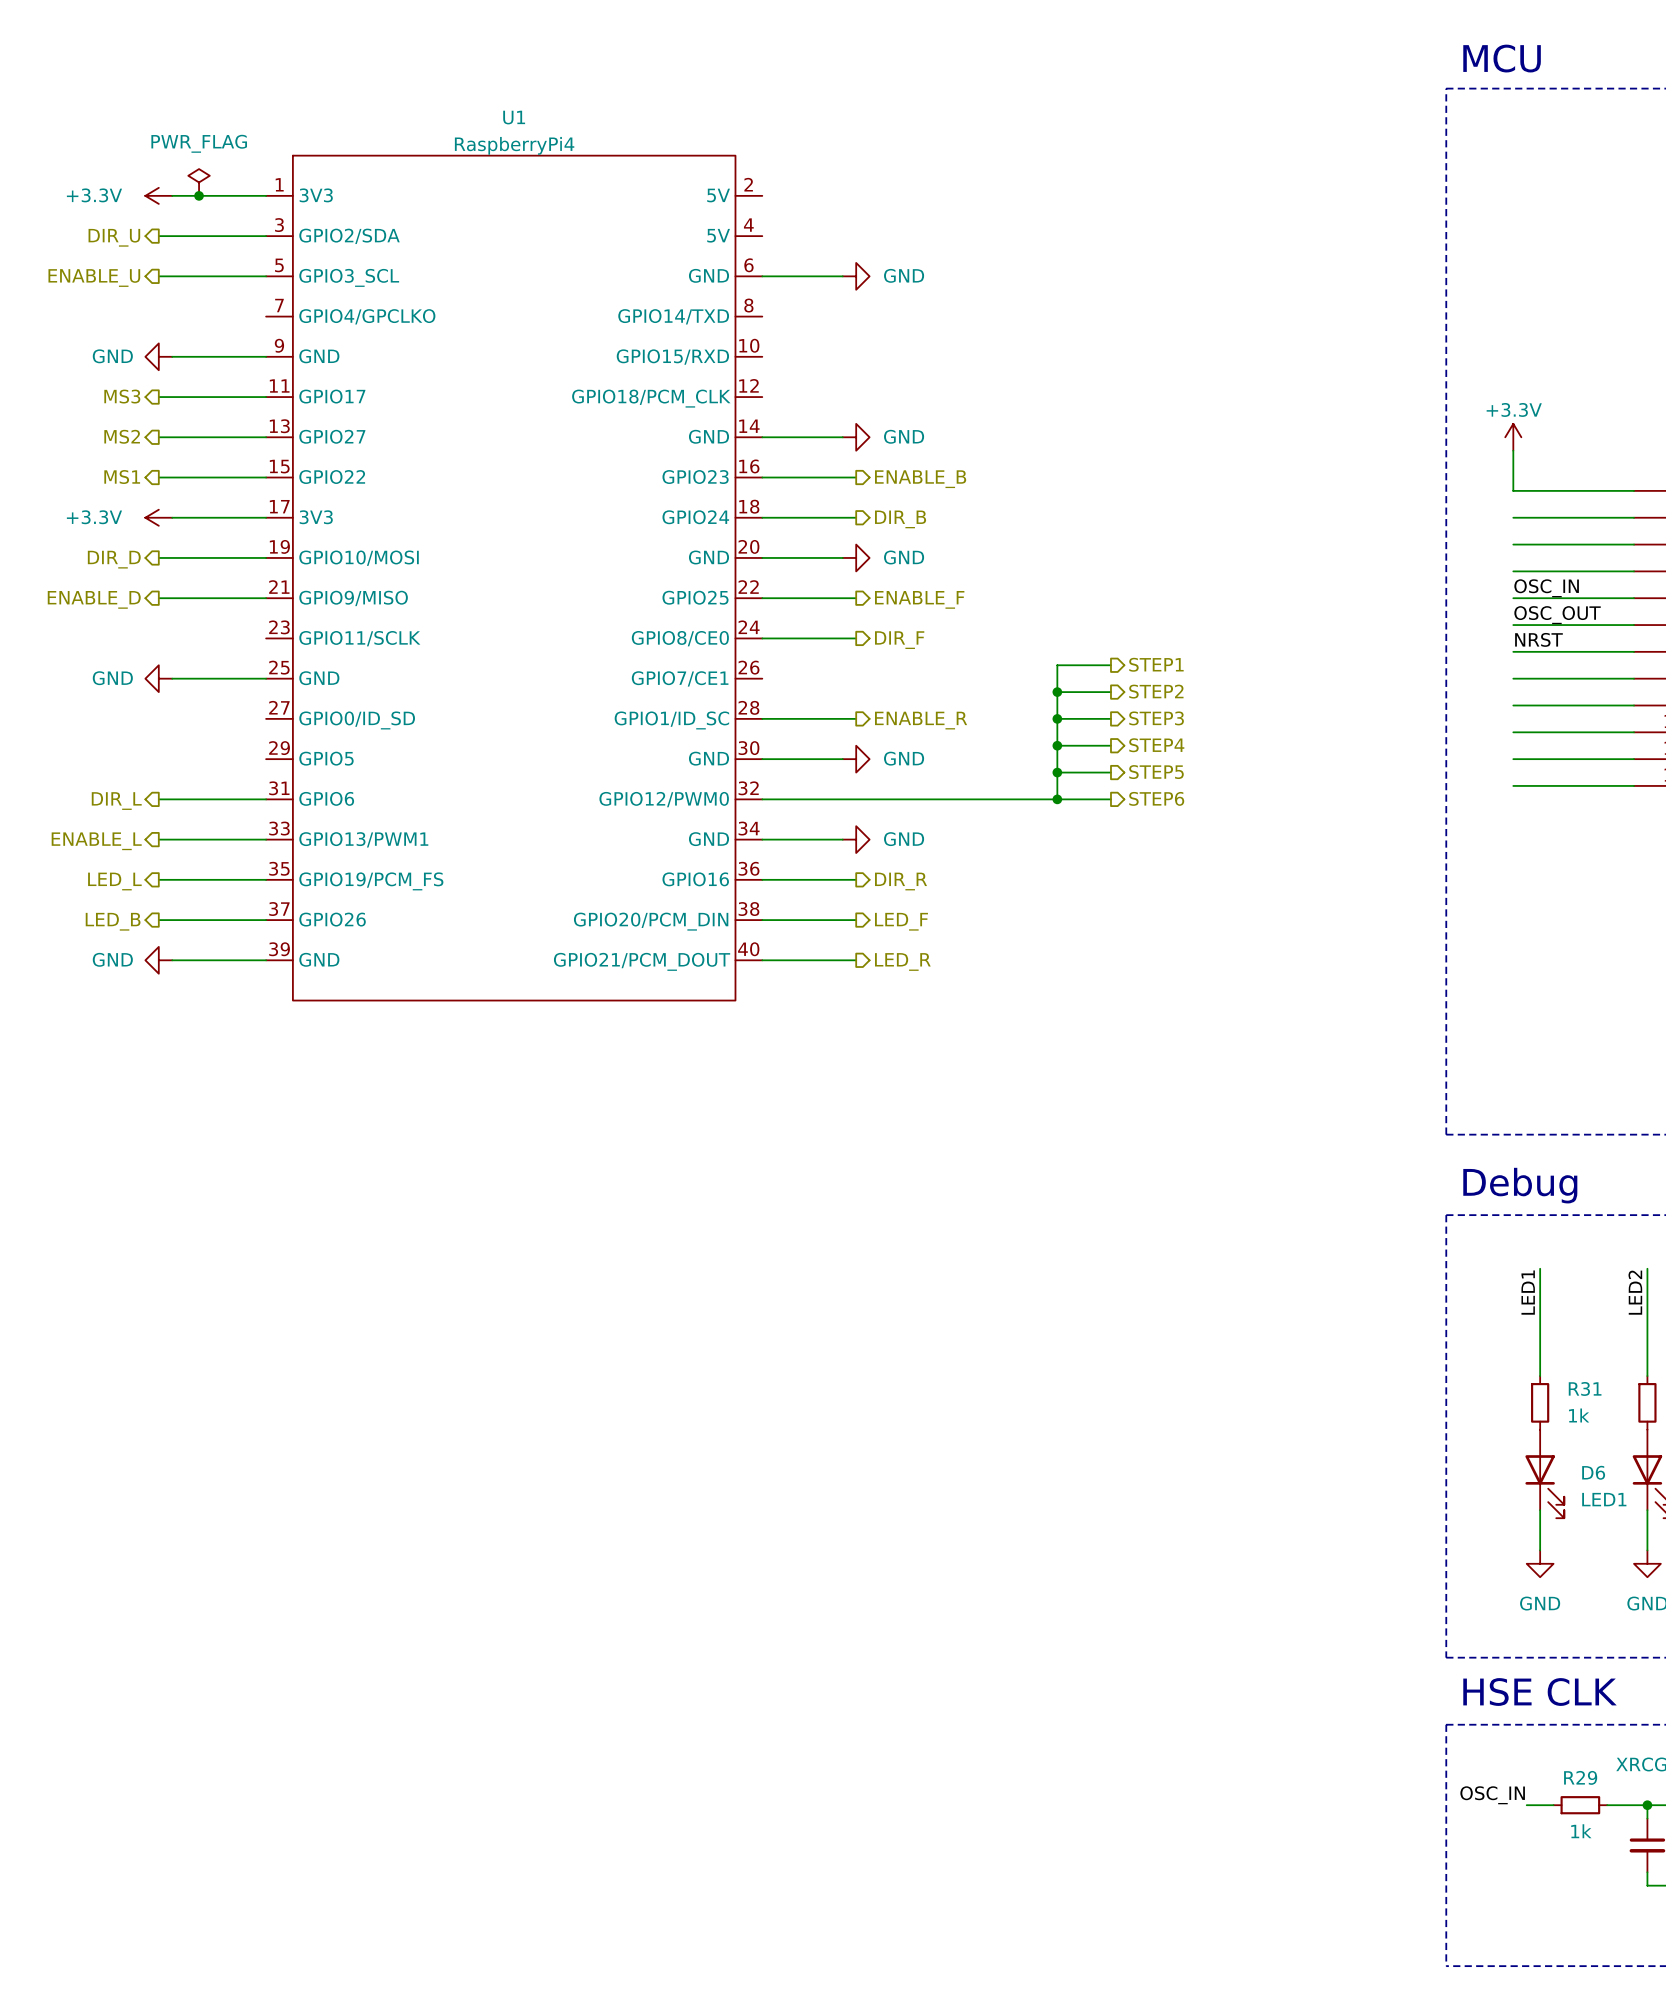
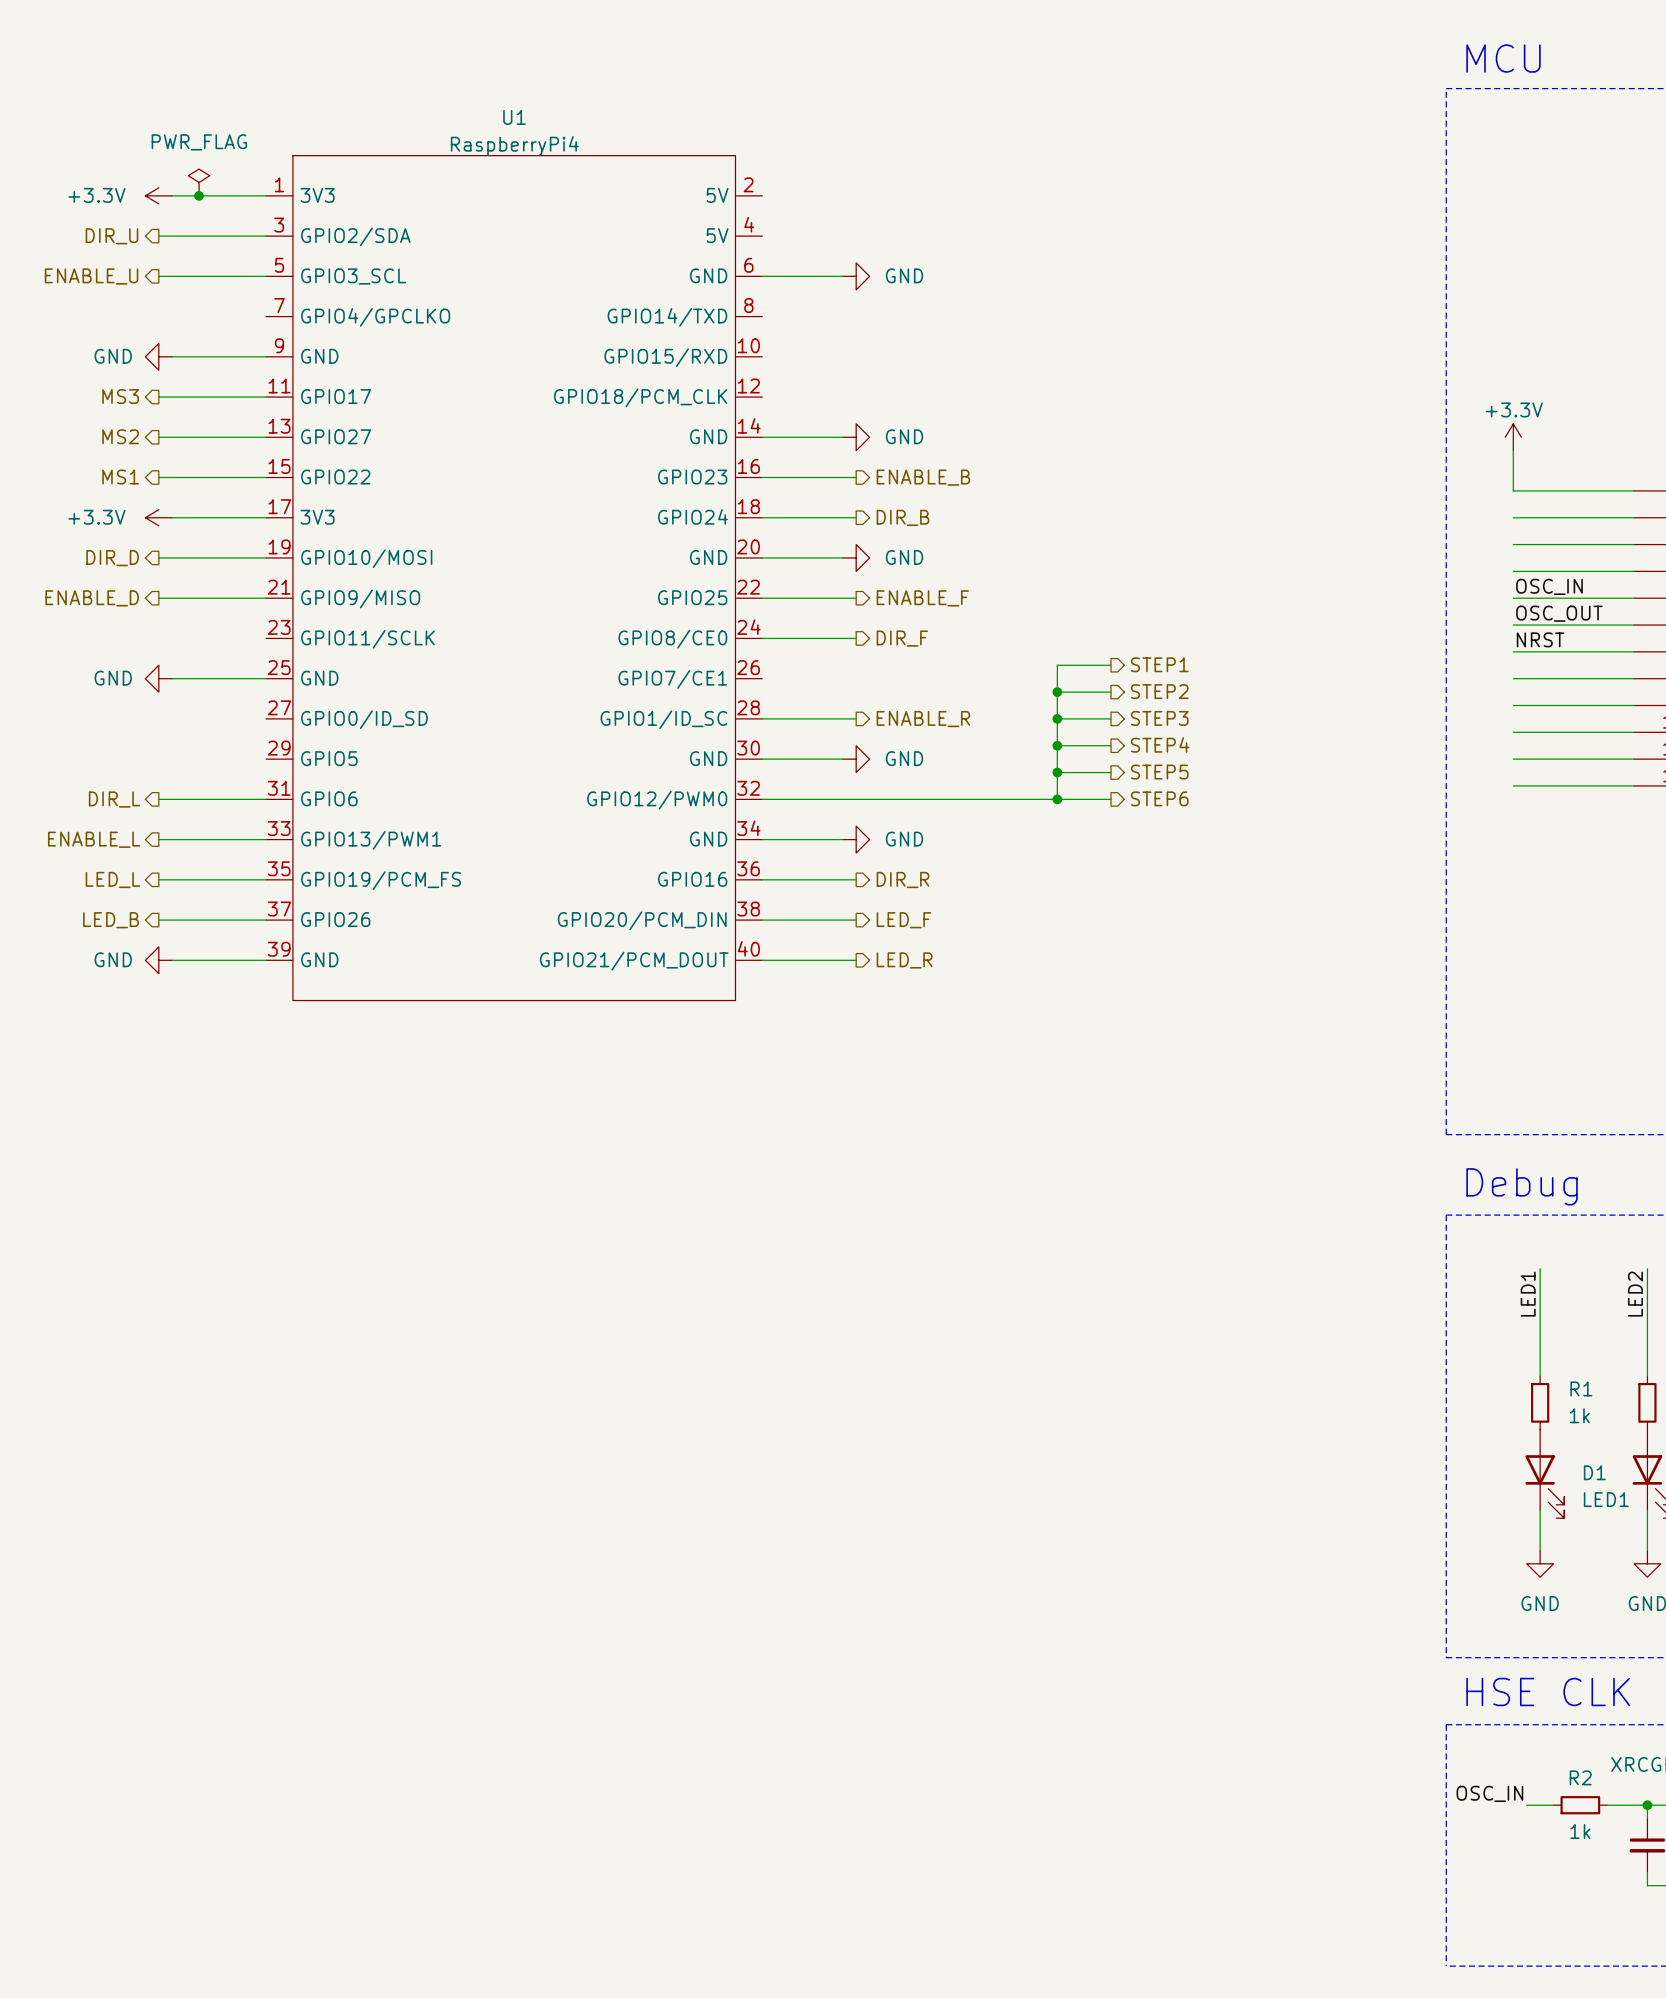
R31 name: R31 (1585, 1388) -> R1 (1581, 1388)
D6 name: D6 (1593, 1472) -> D1 (1594, 1472)
R29 name: R29 (1580, 1777) -> R2 (1580, 1777)

